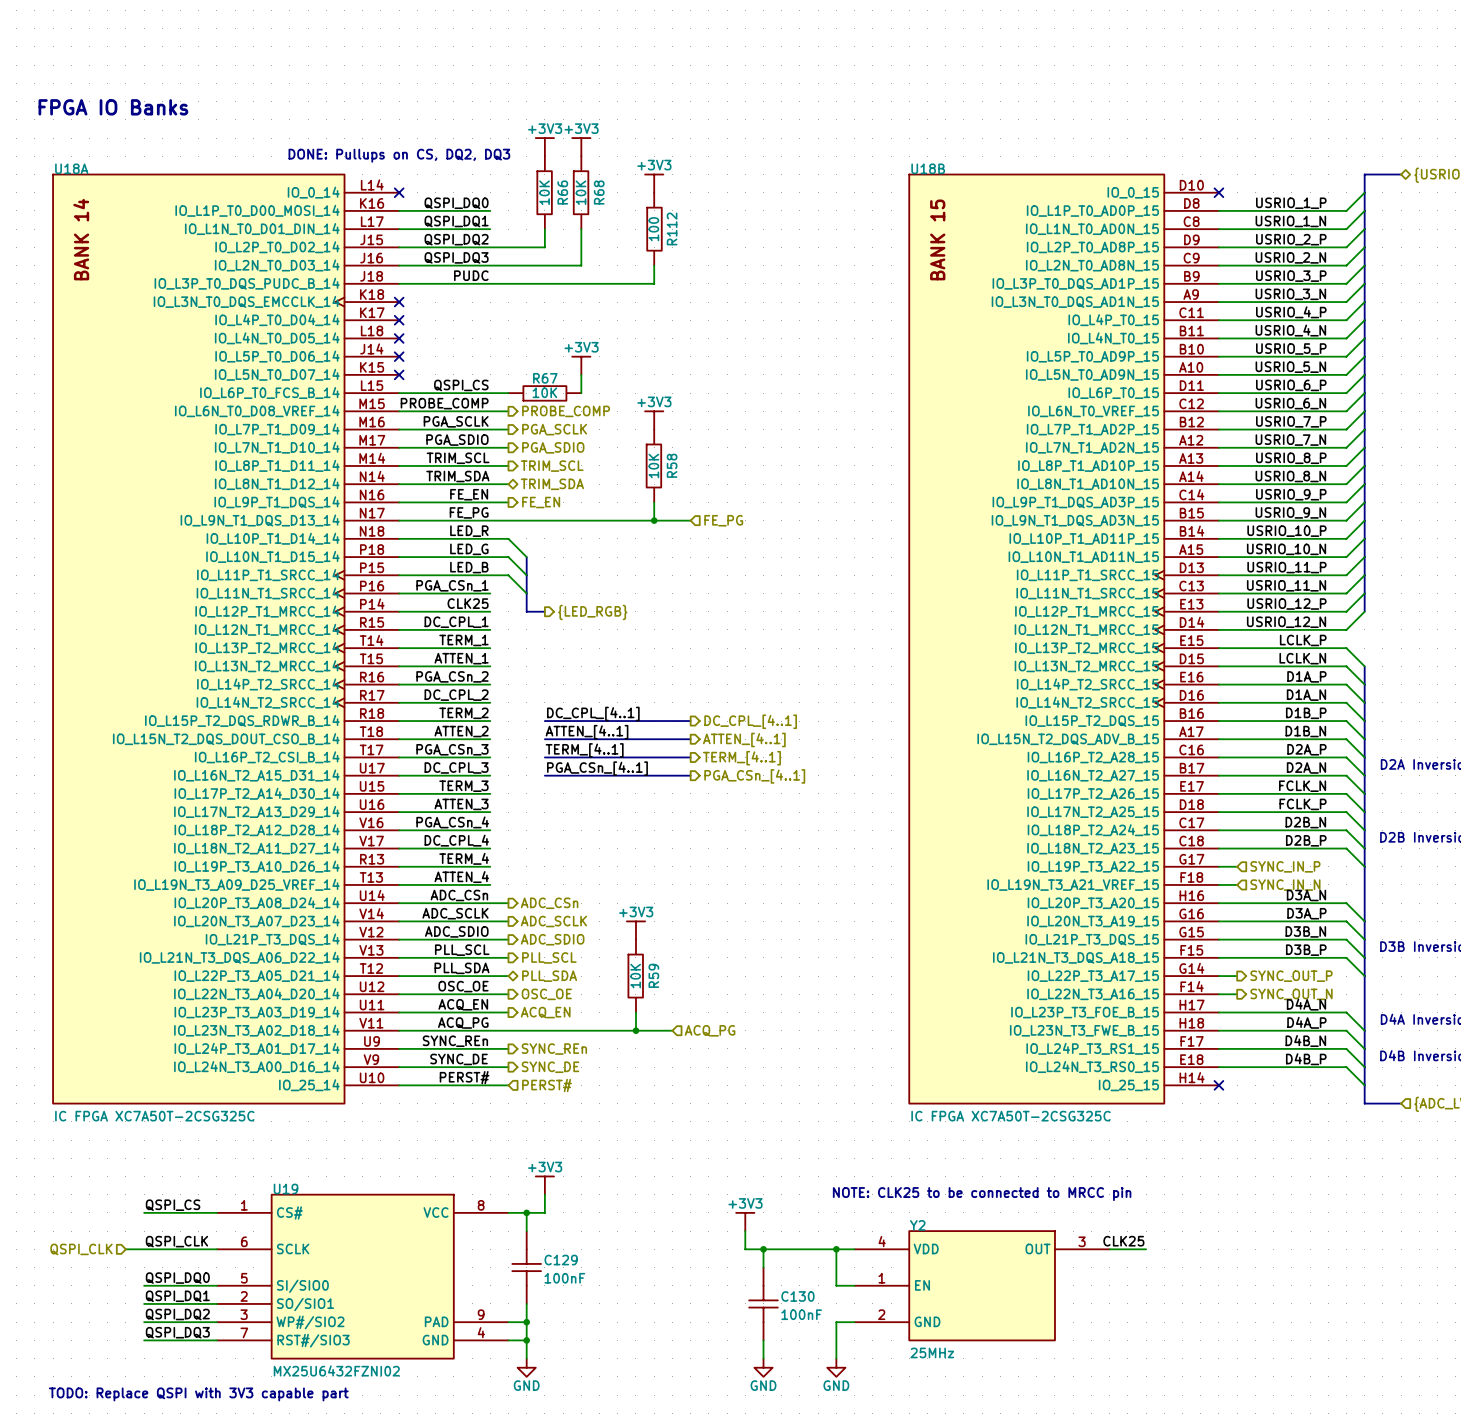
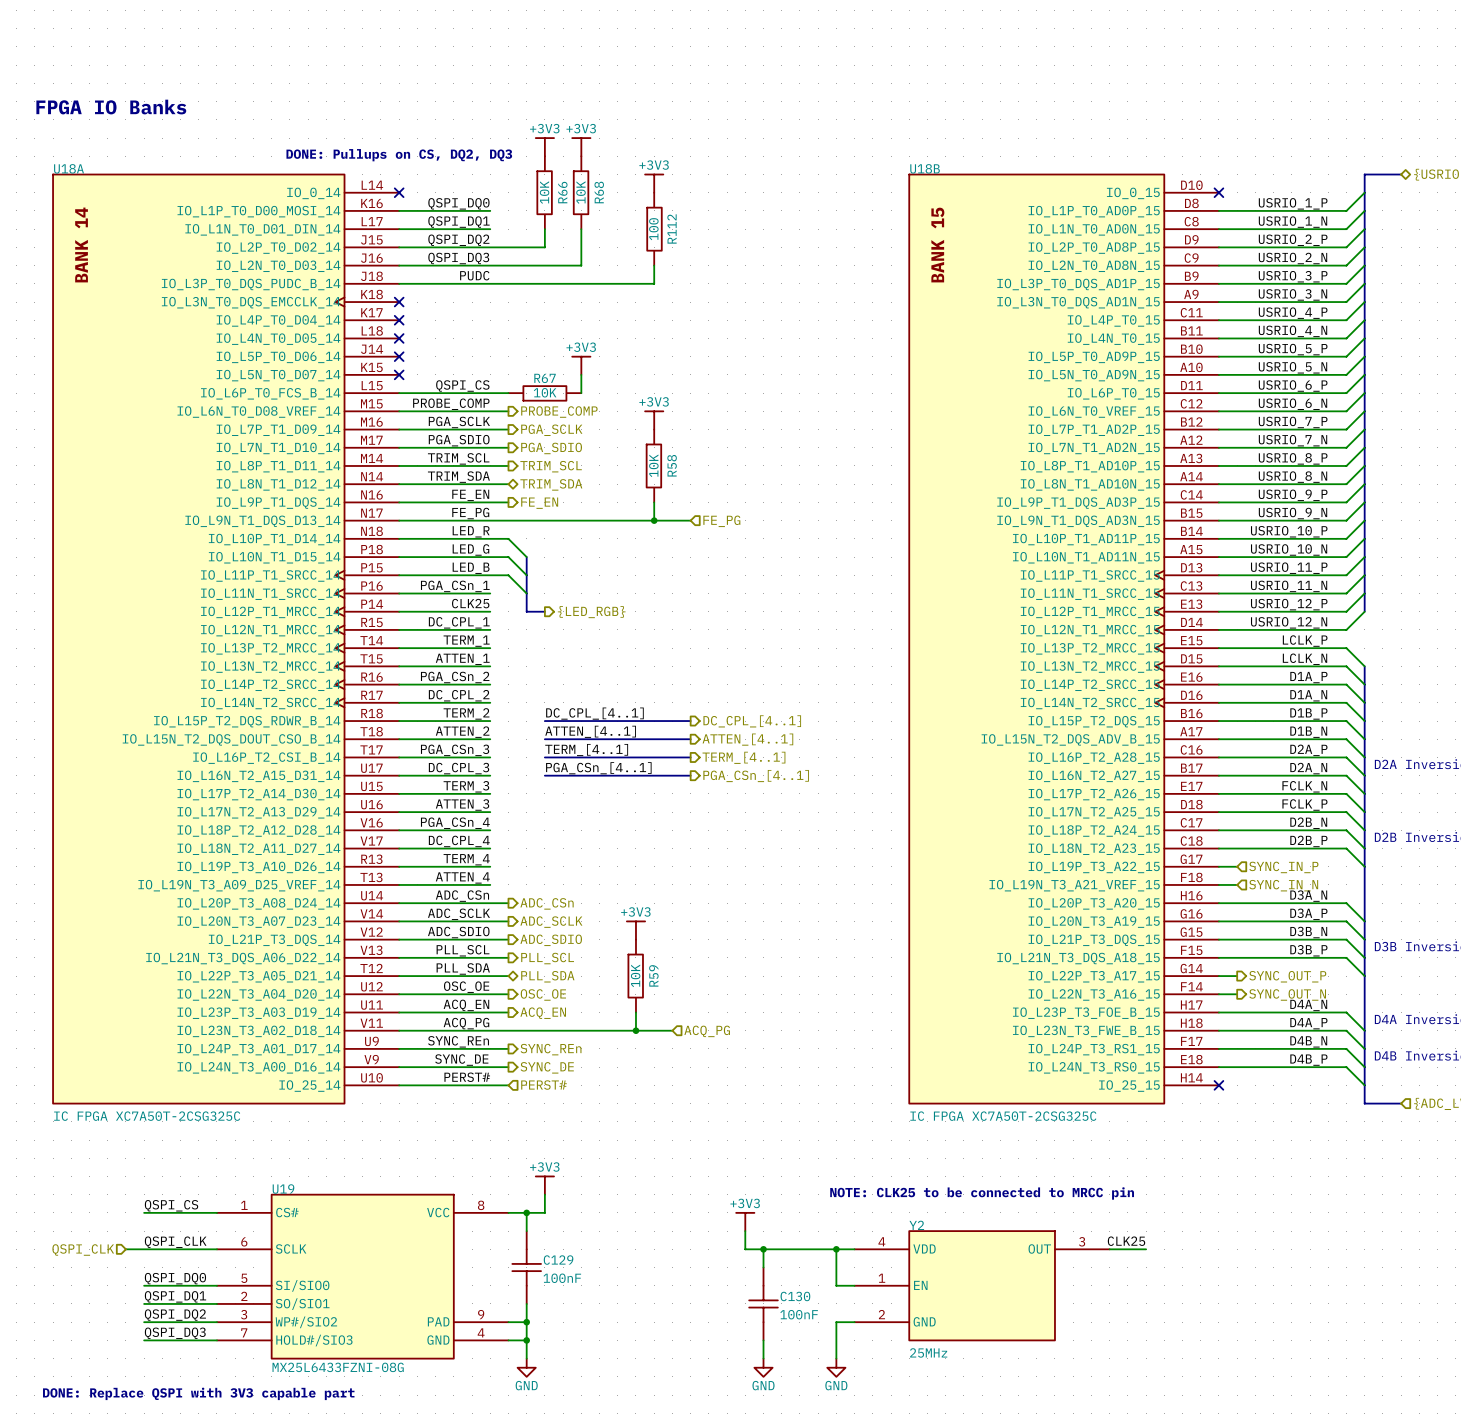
U19 pin name: RST#/SIO3 (313, 1340) -> HOLD#/SIO3 (314, 1340)
U19 value: MX25U6432FZNI02 (336, 1370) -> MX25L6433FZNI-08G (338, 1367)
text: TODO: Replace QSPI with 3V3 capable part (198, 1394) -> DONE: Replace QSPI with 3V3 capable part (198, 1393)

